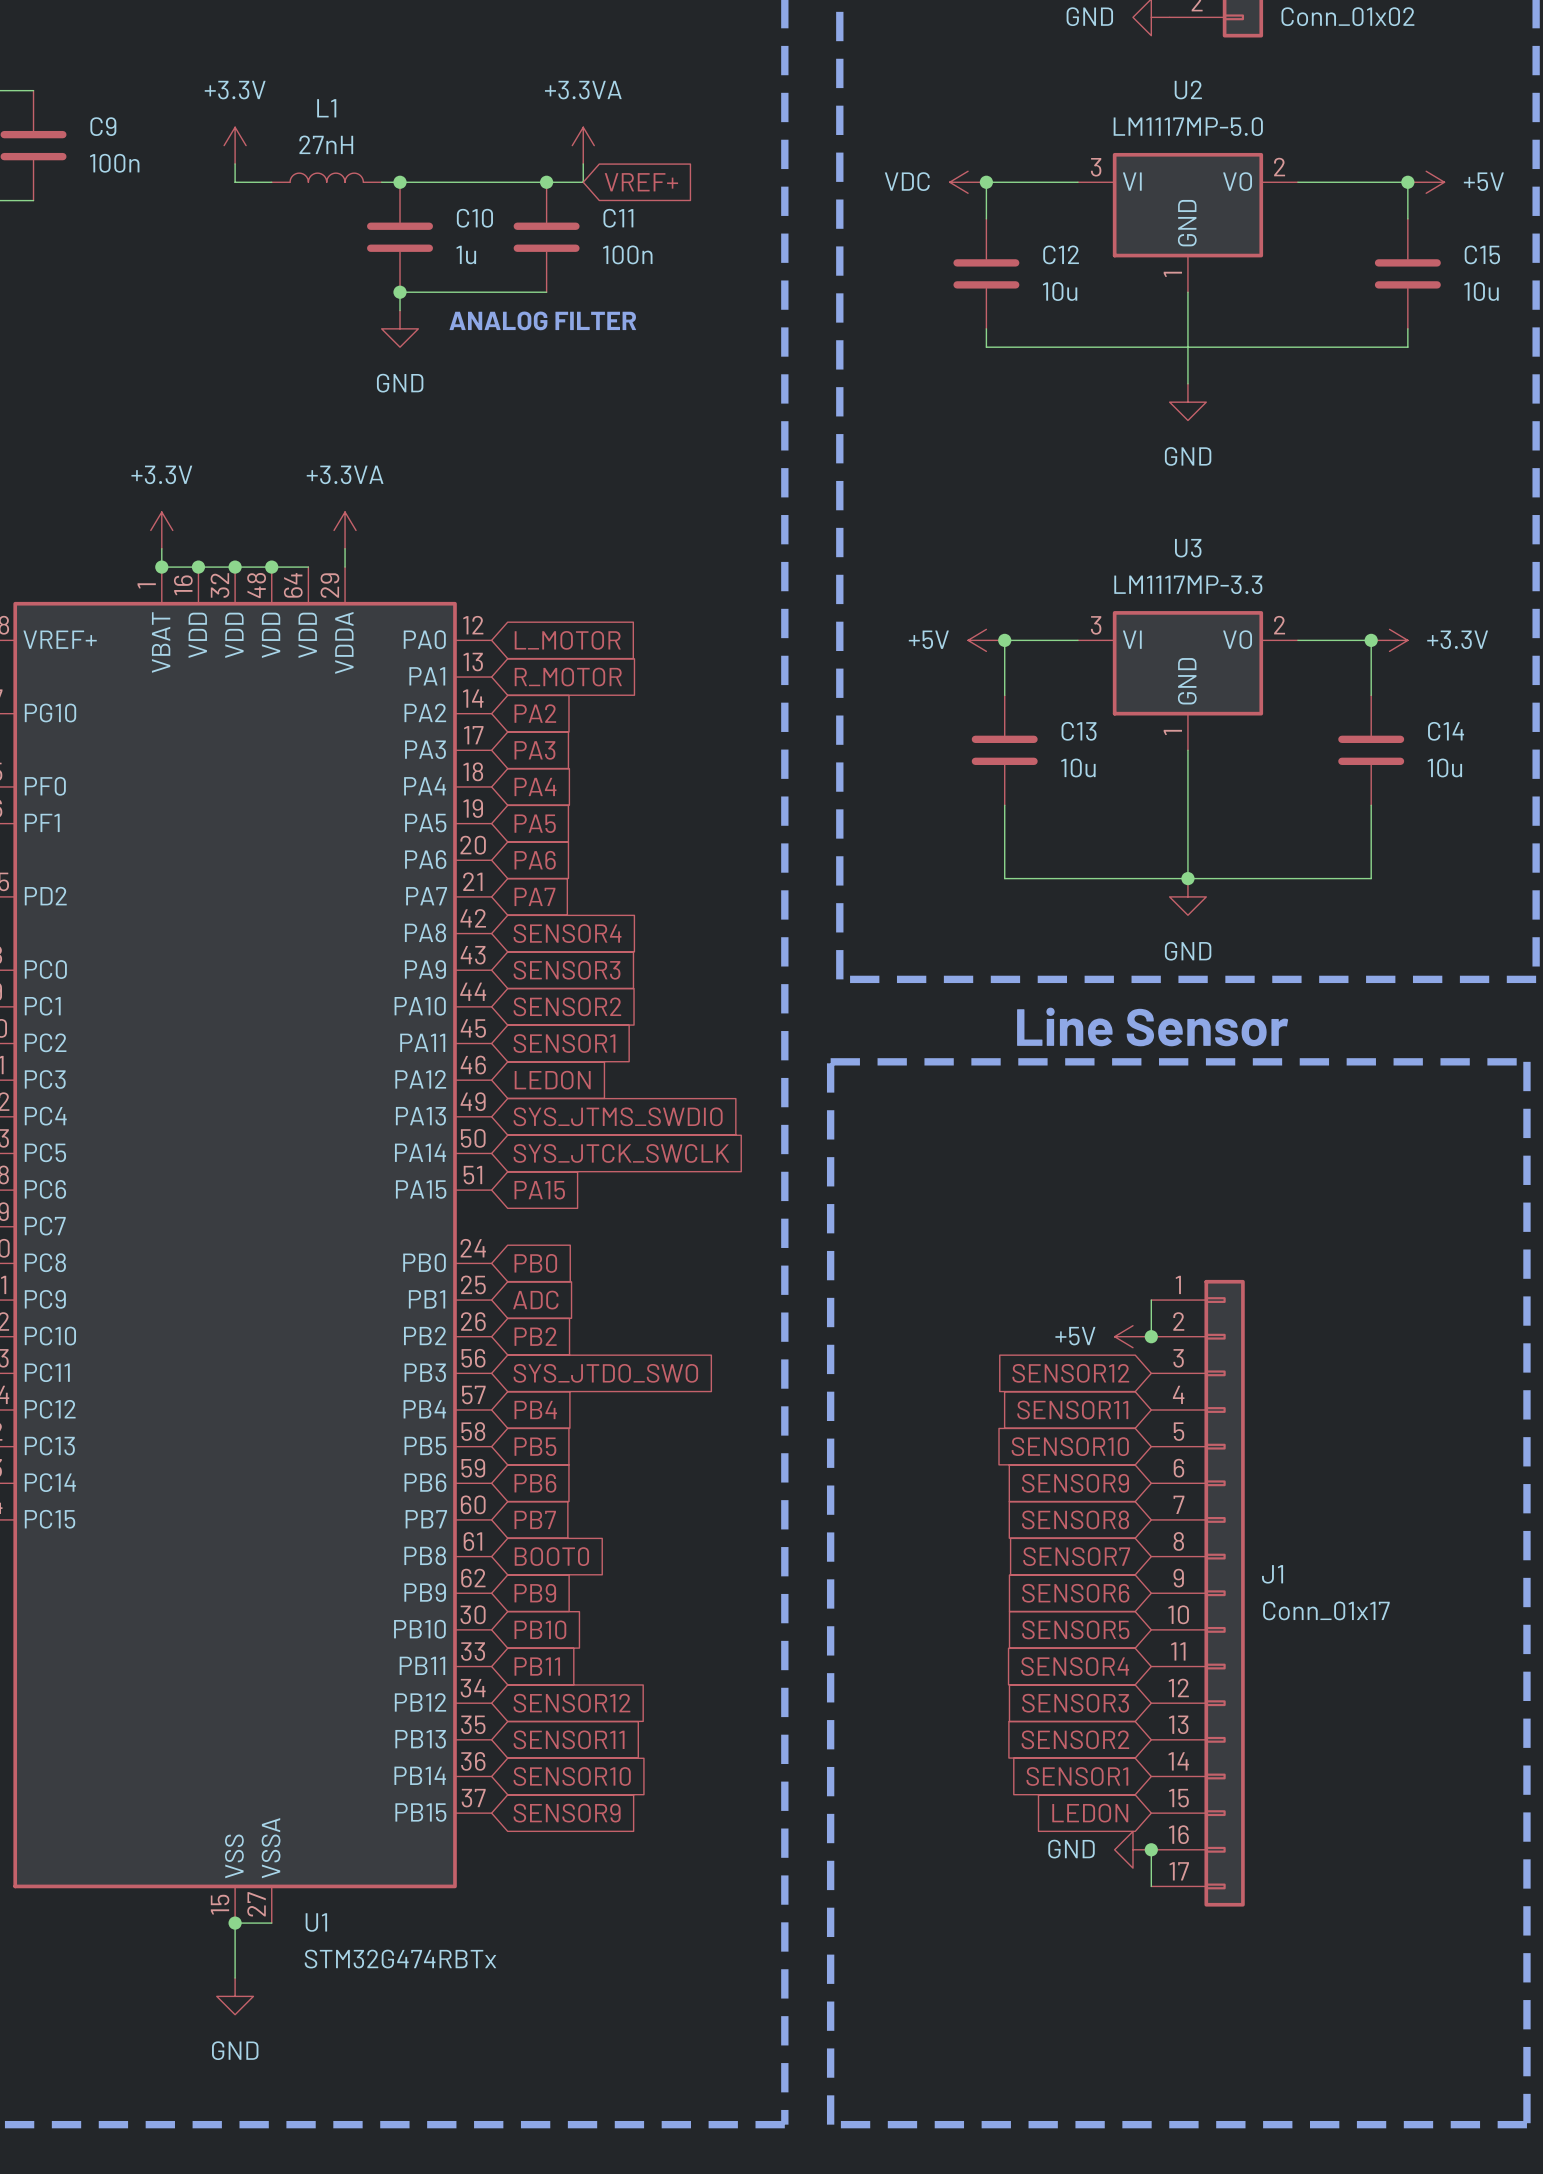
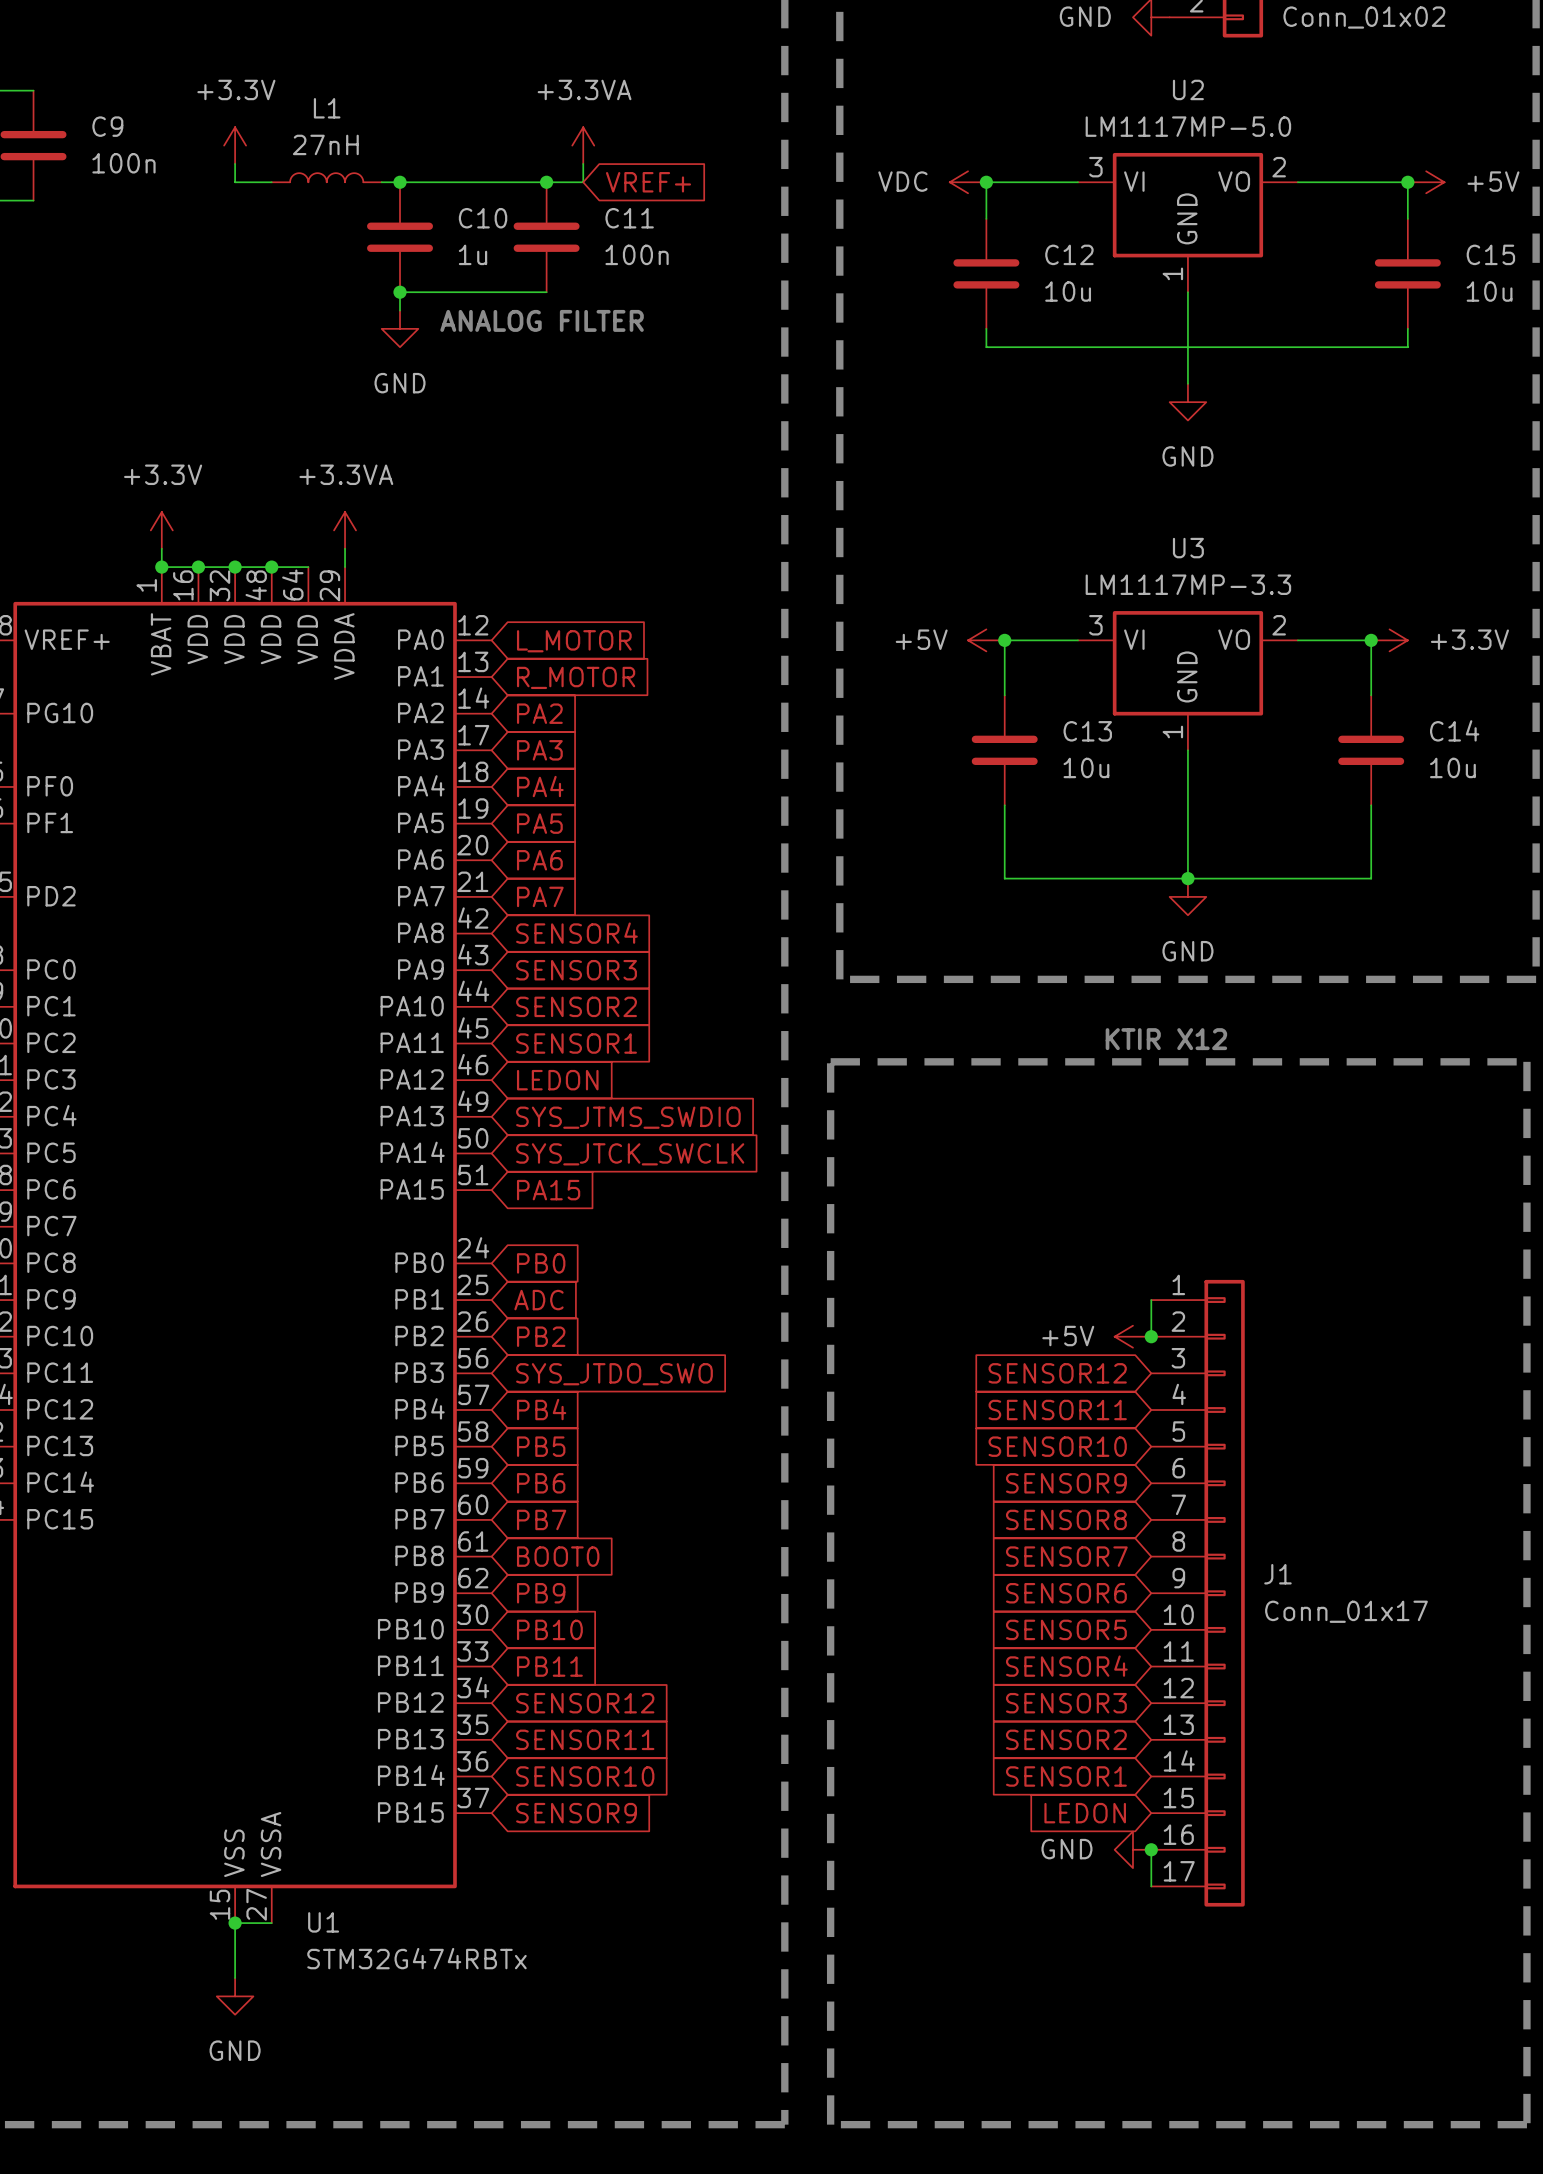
text: Line Sensor (1152, 1026) -> none
text: none -> KTIR X12 (1166, 1039)

